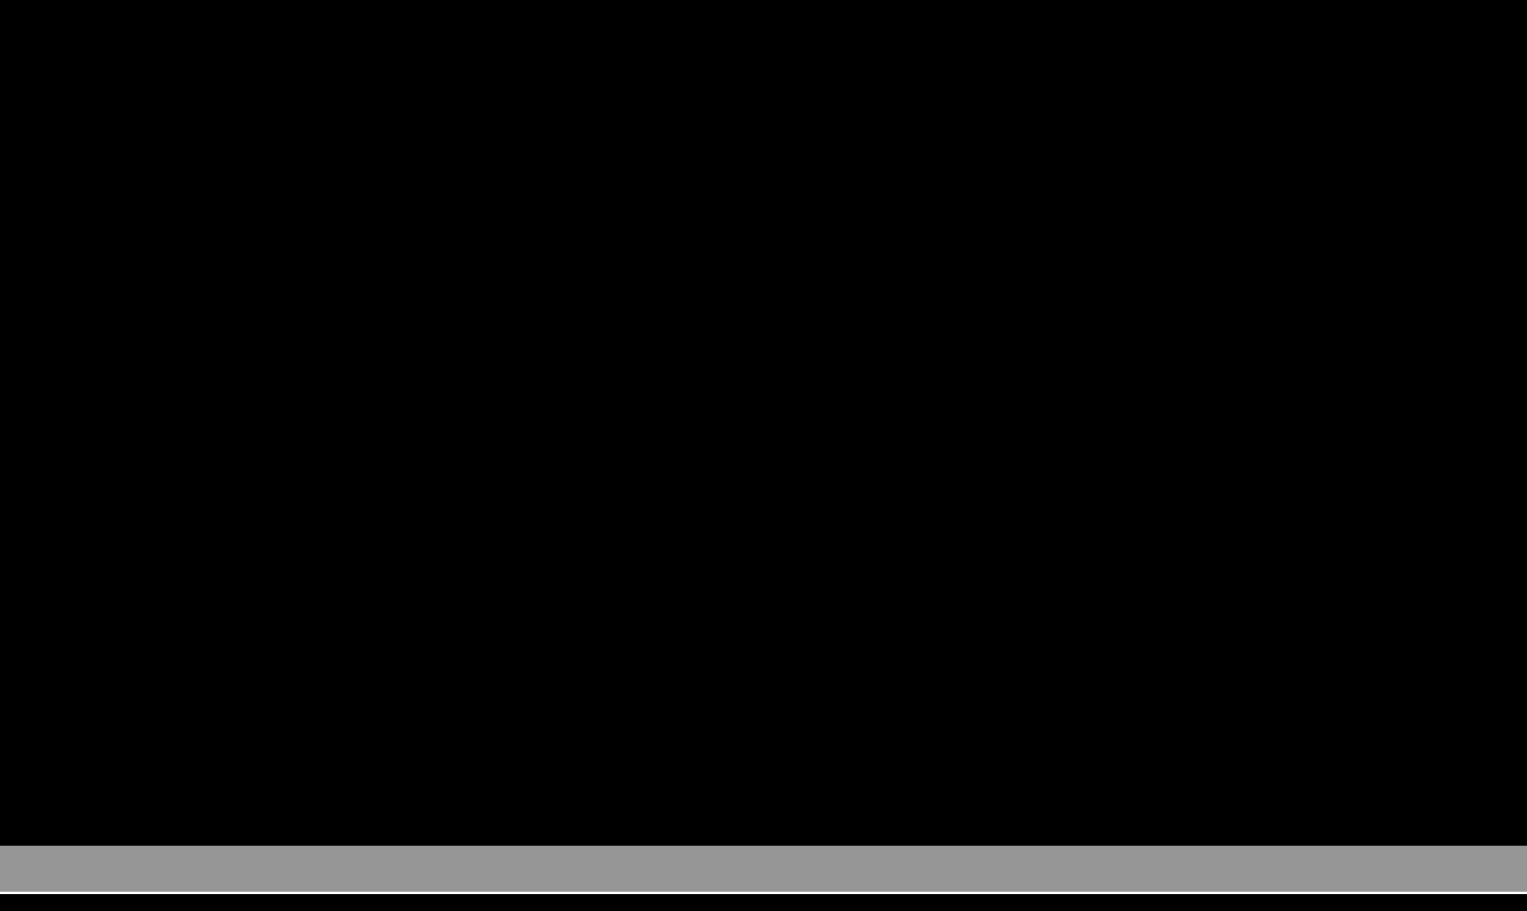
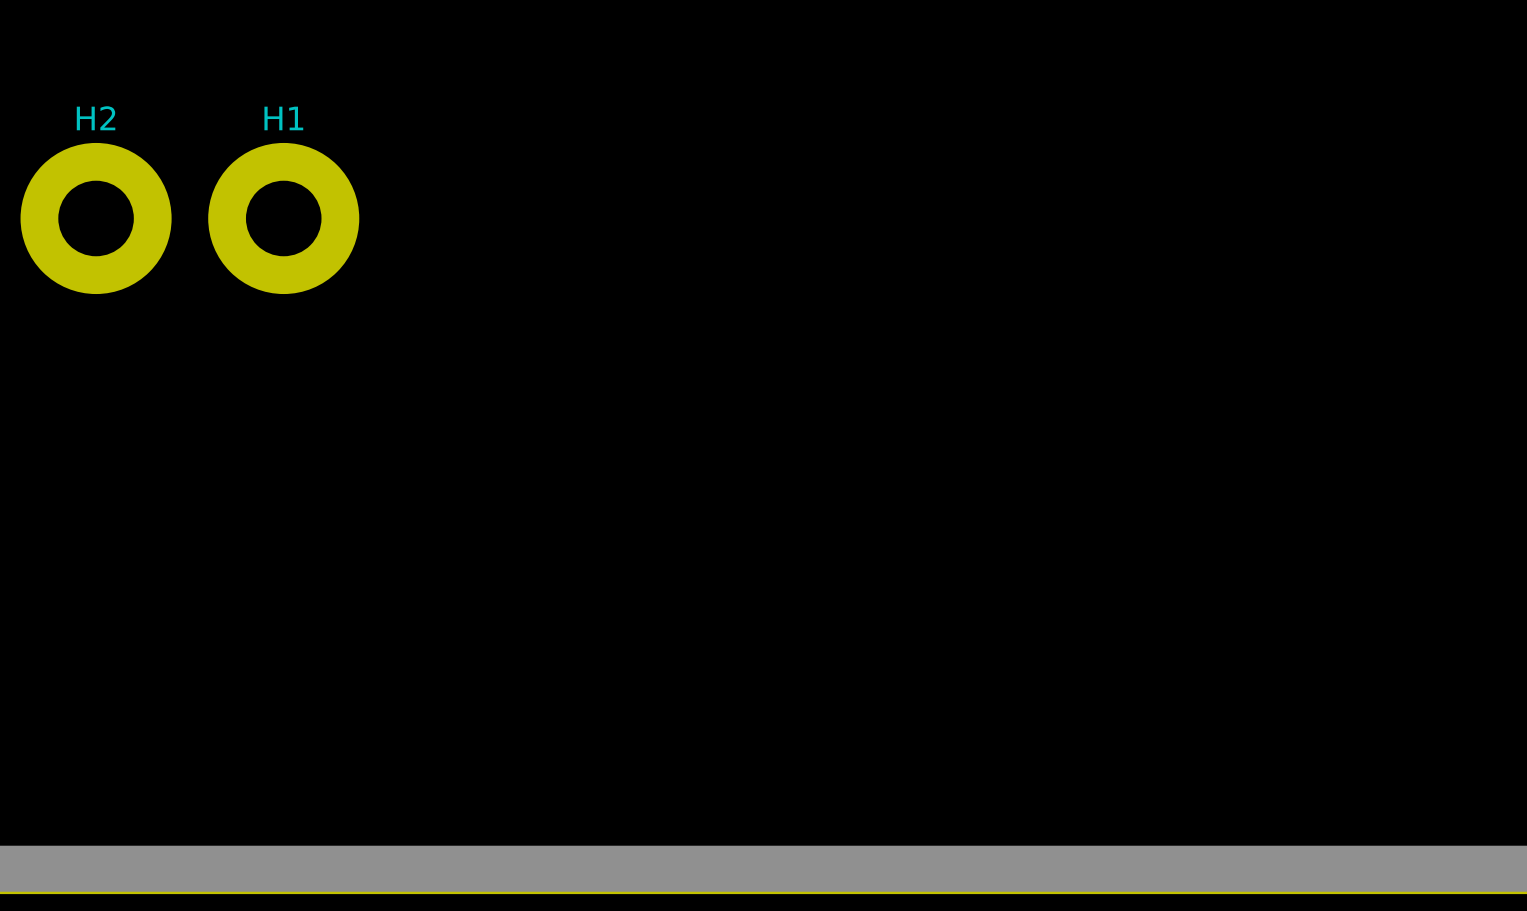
H2: none -> (96, 218)
H1: none -> (283, 218)

